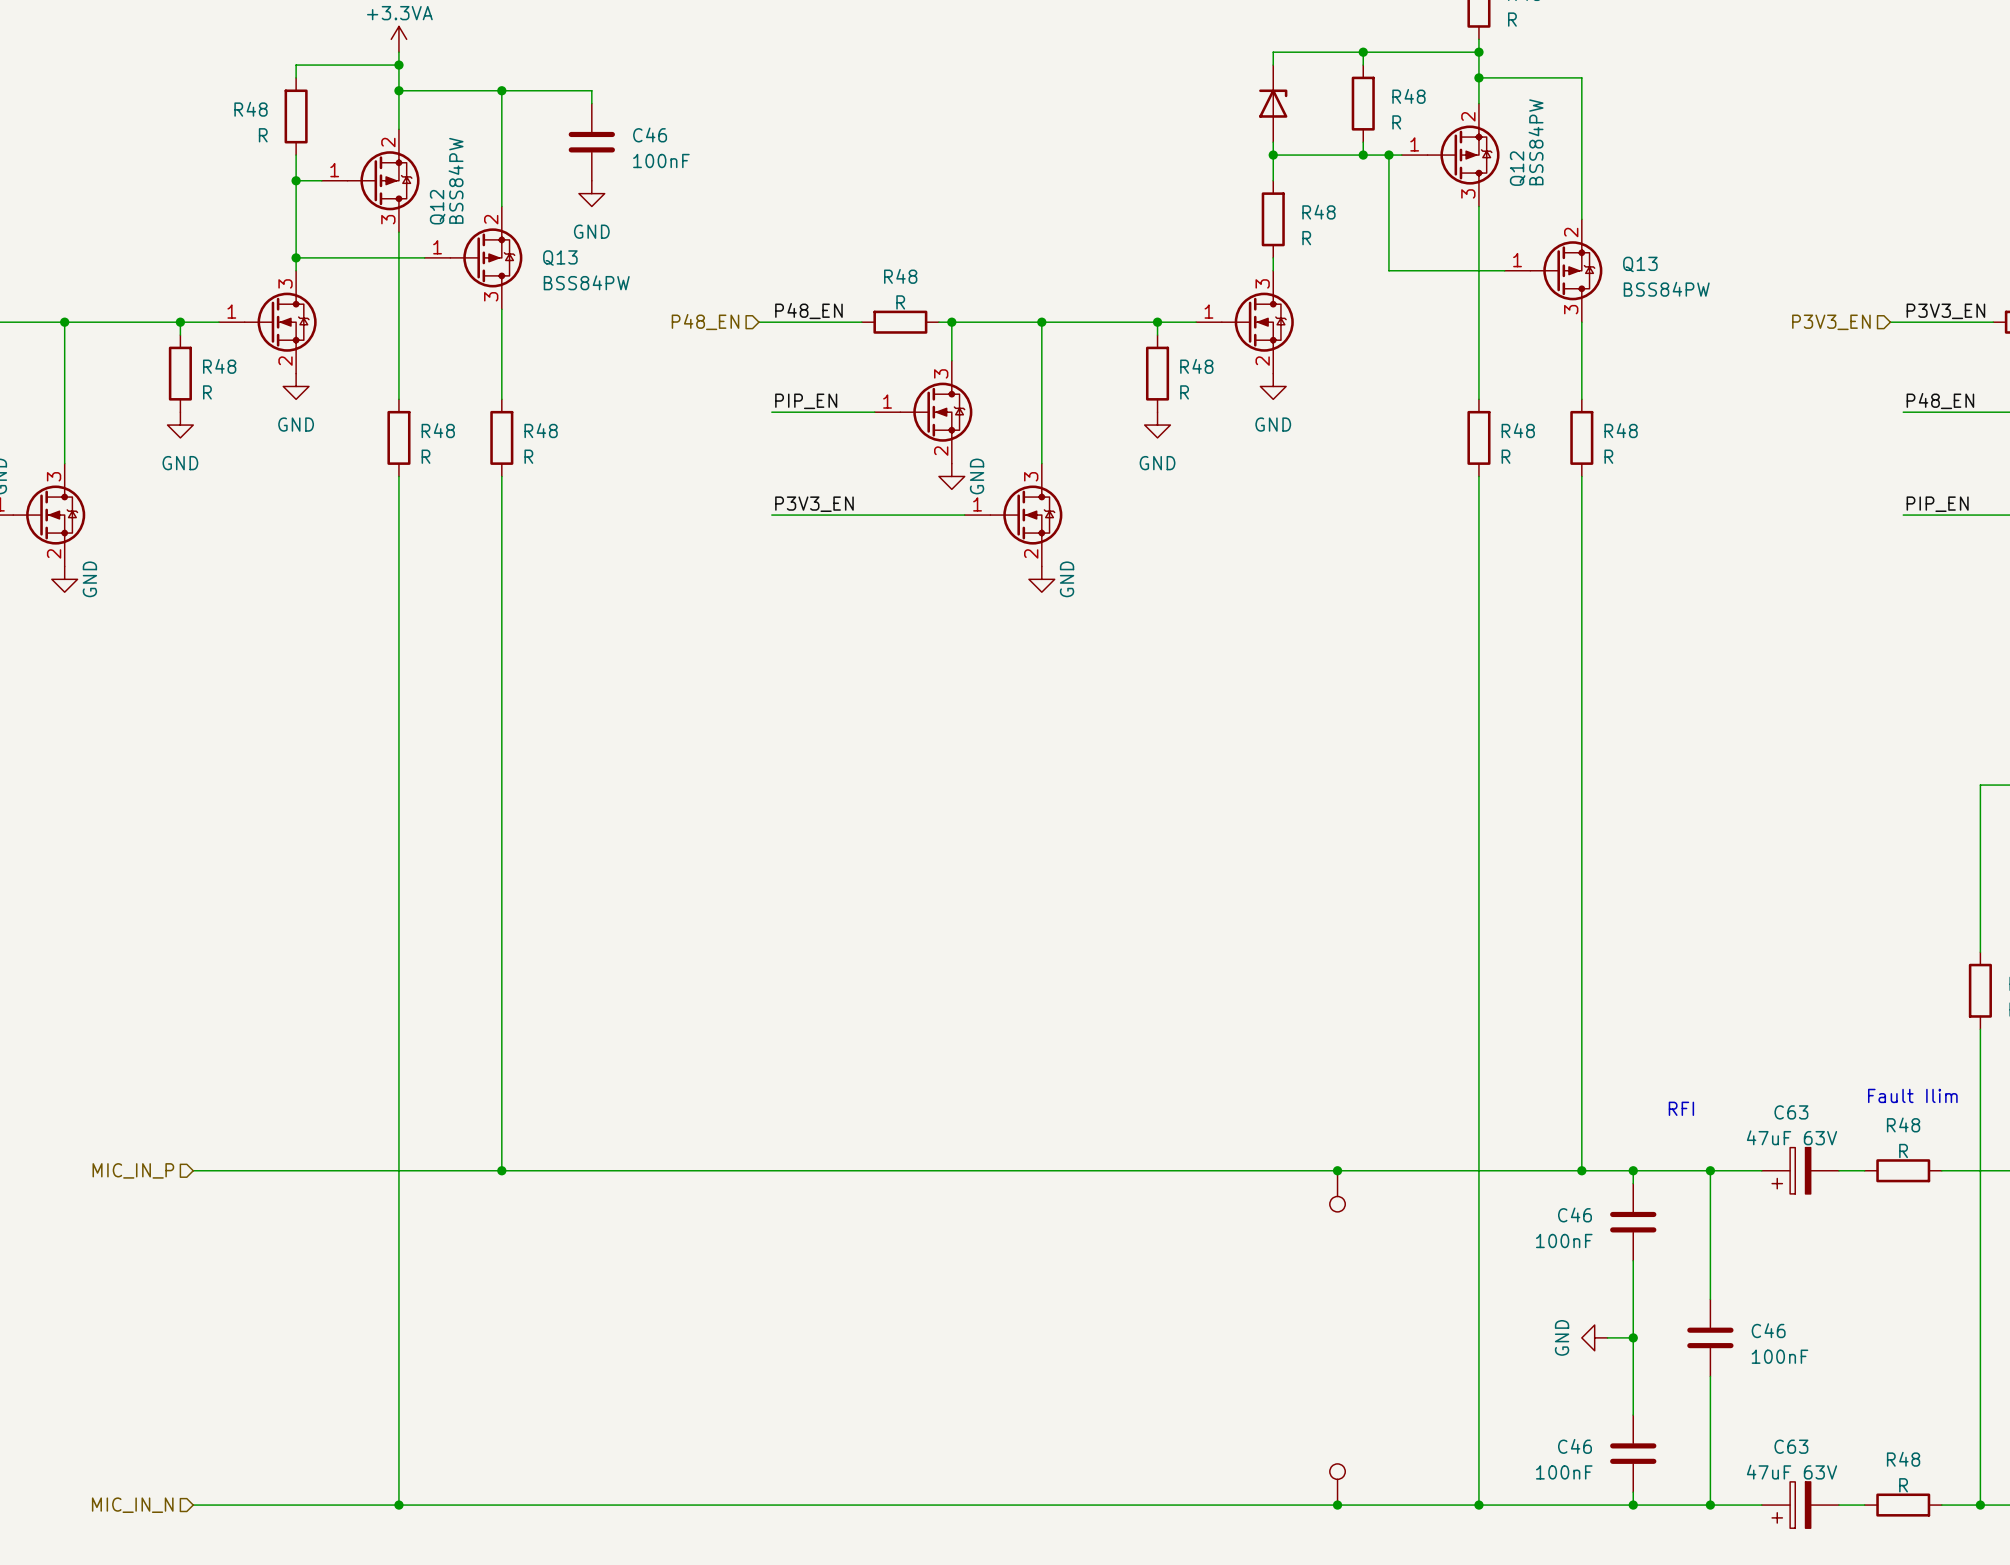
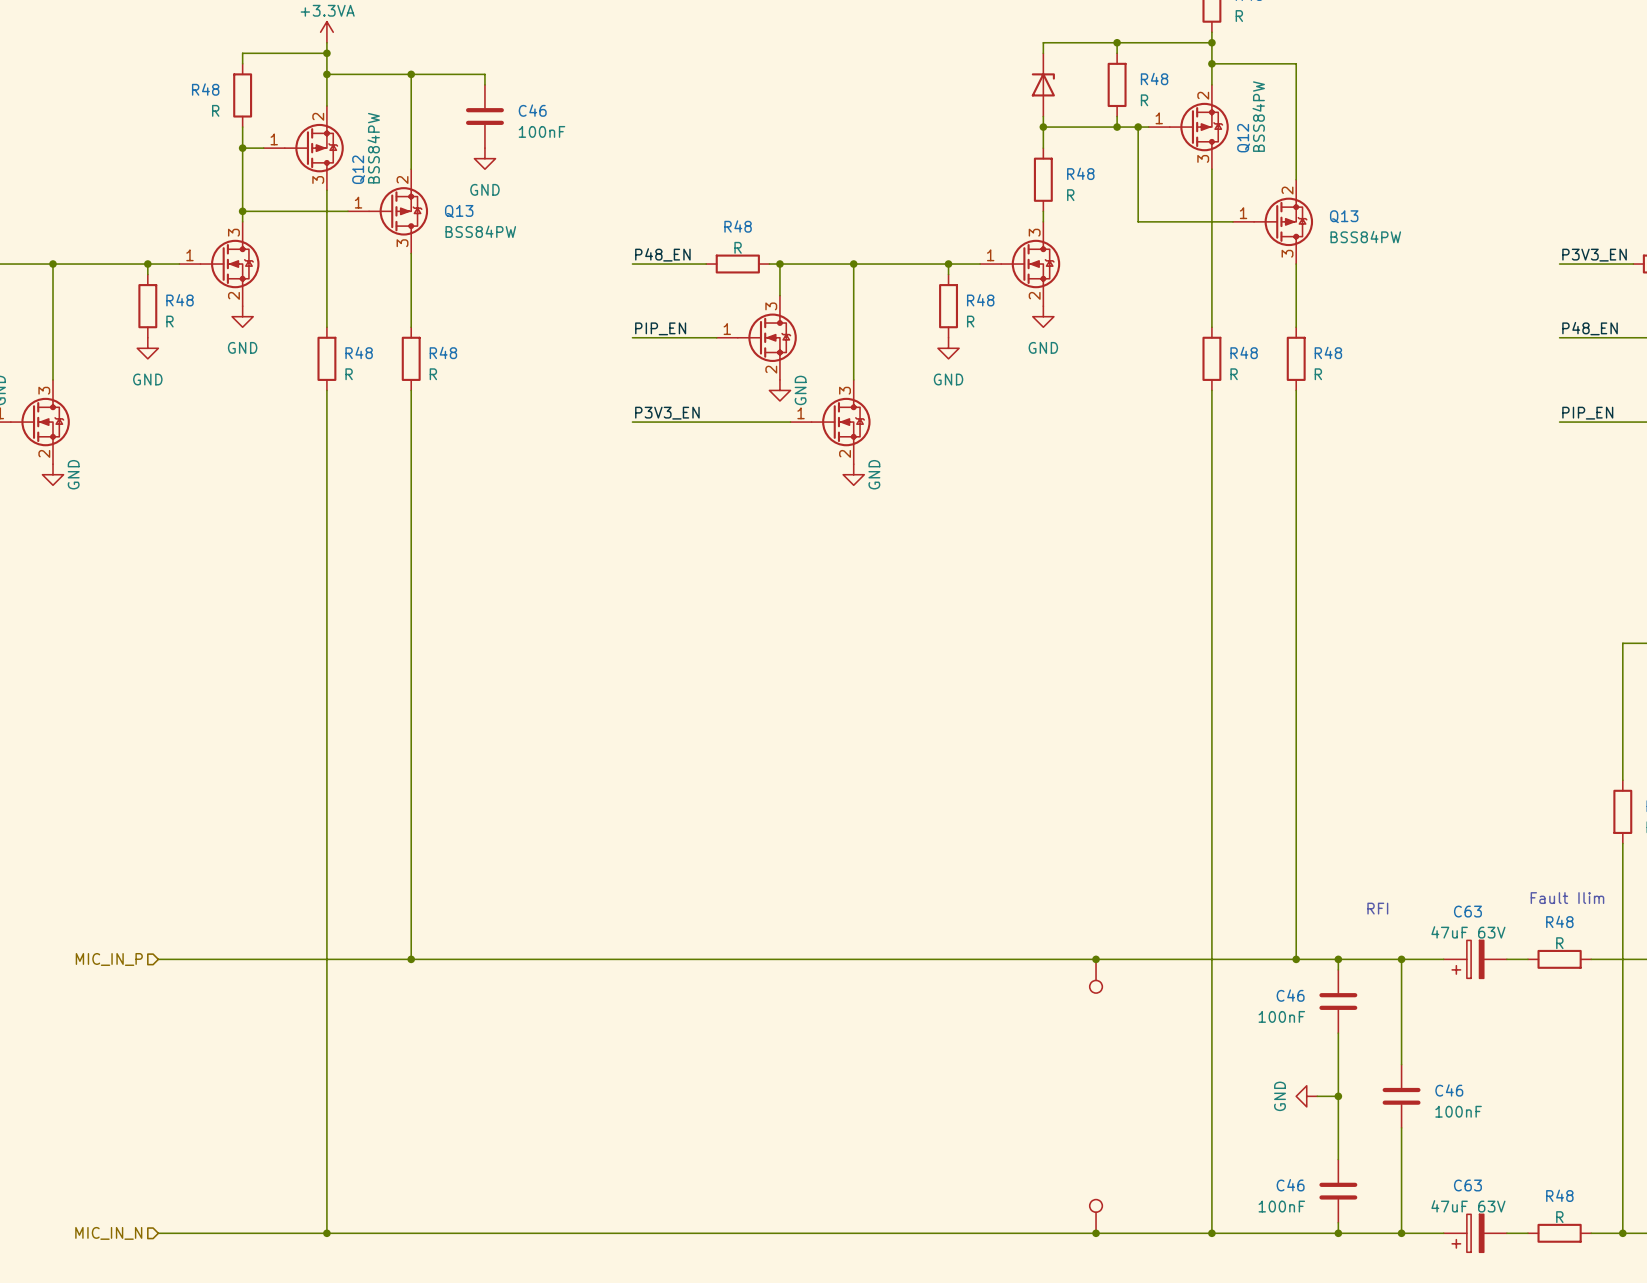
hierarchical label: P48_EN (705, 322) -> none
wire: (758, 322) (771, 322) -> none
hierarchical label: P3V3_EN (1831, 322) -> none
wire: (1890, 322) (1903, 322) -> none

